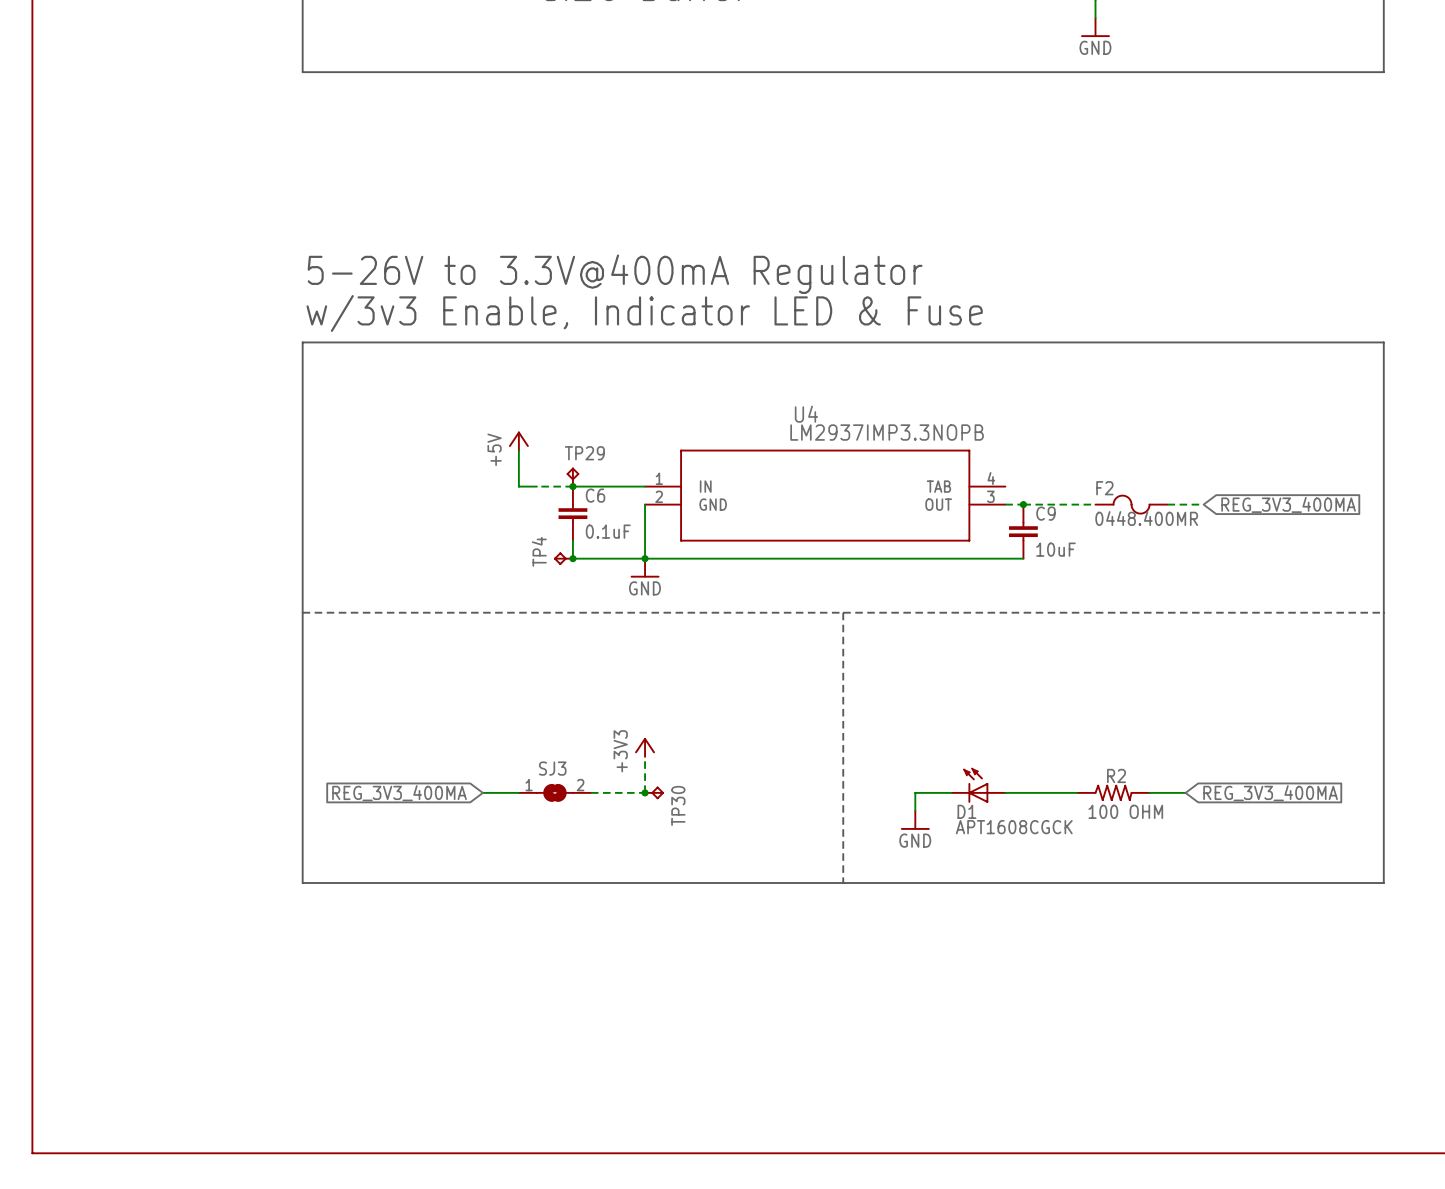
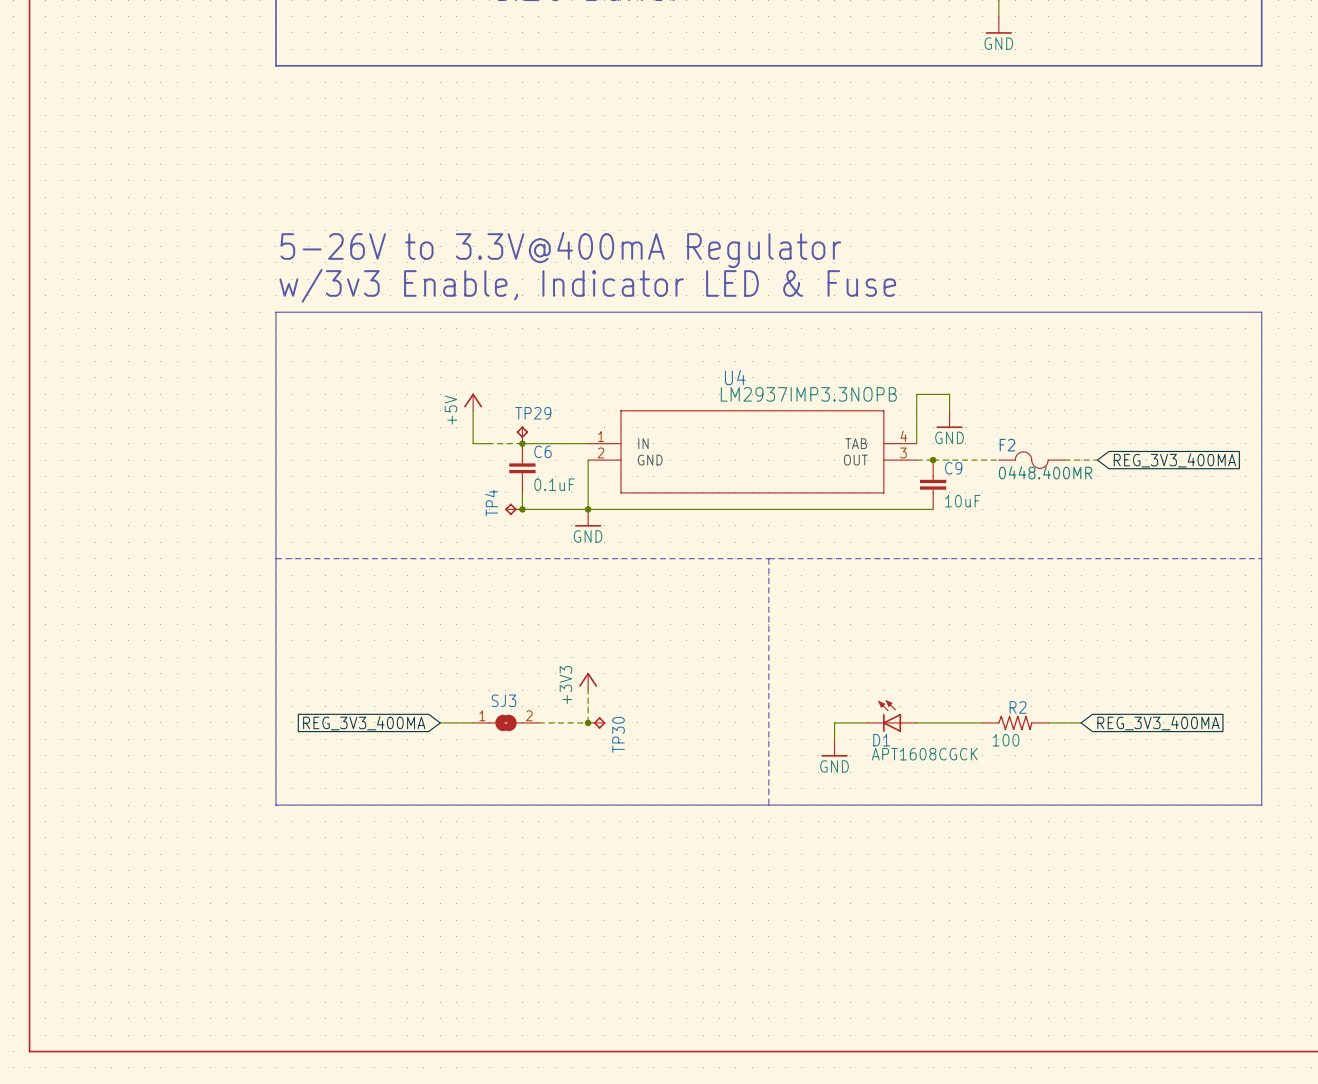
wire: none -> (949, 410) (949, 394) (916, 394) (916, 443)
power symbol: none -> GND (949, 419)
R2 value: 100 OHM (1125, 811) -> 100 (1006, 740)

